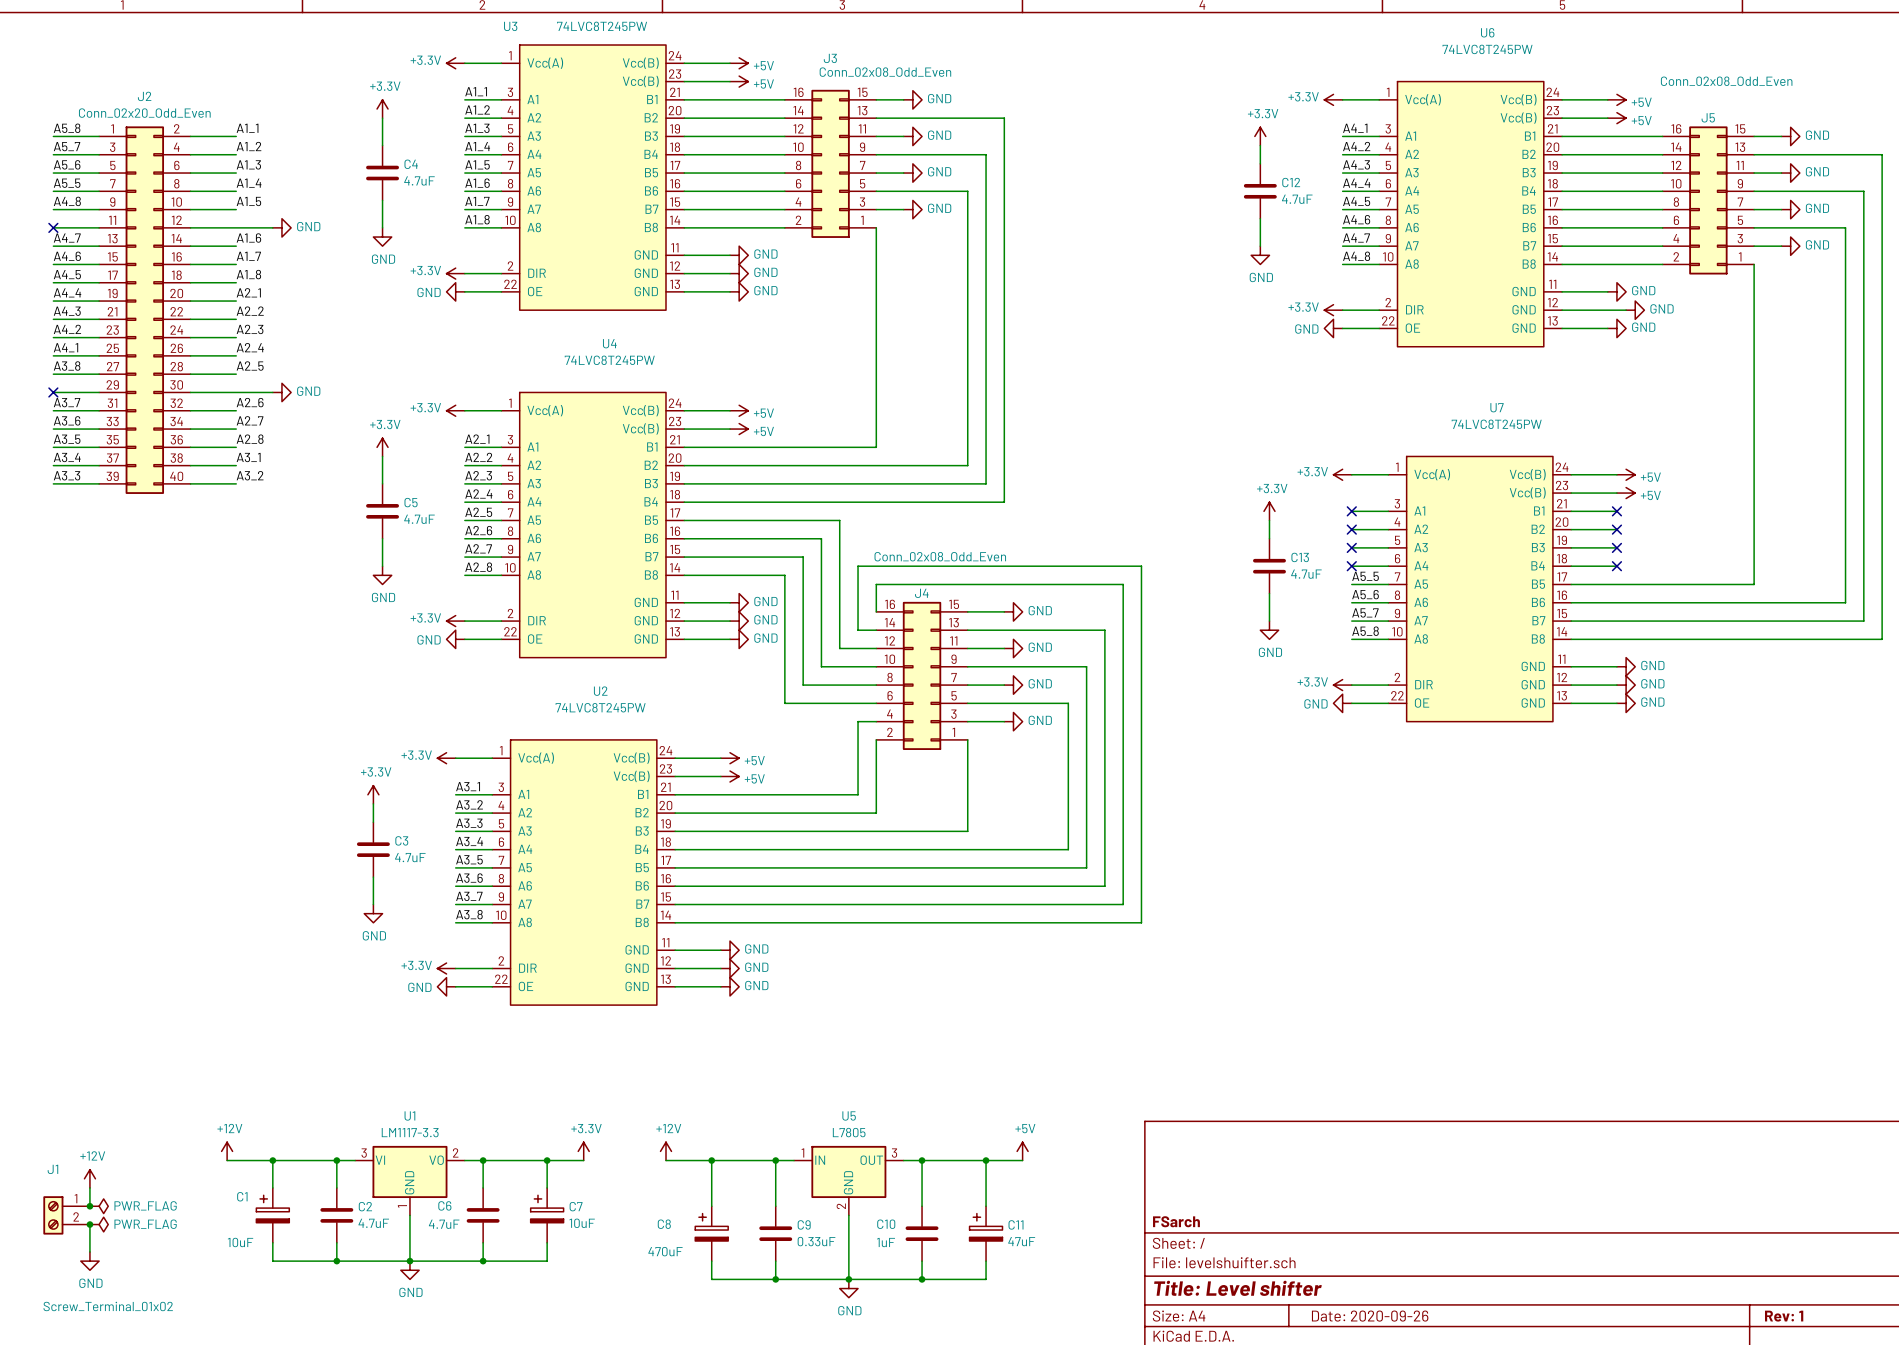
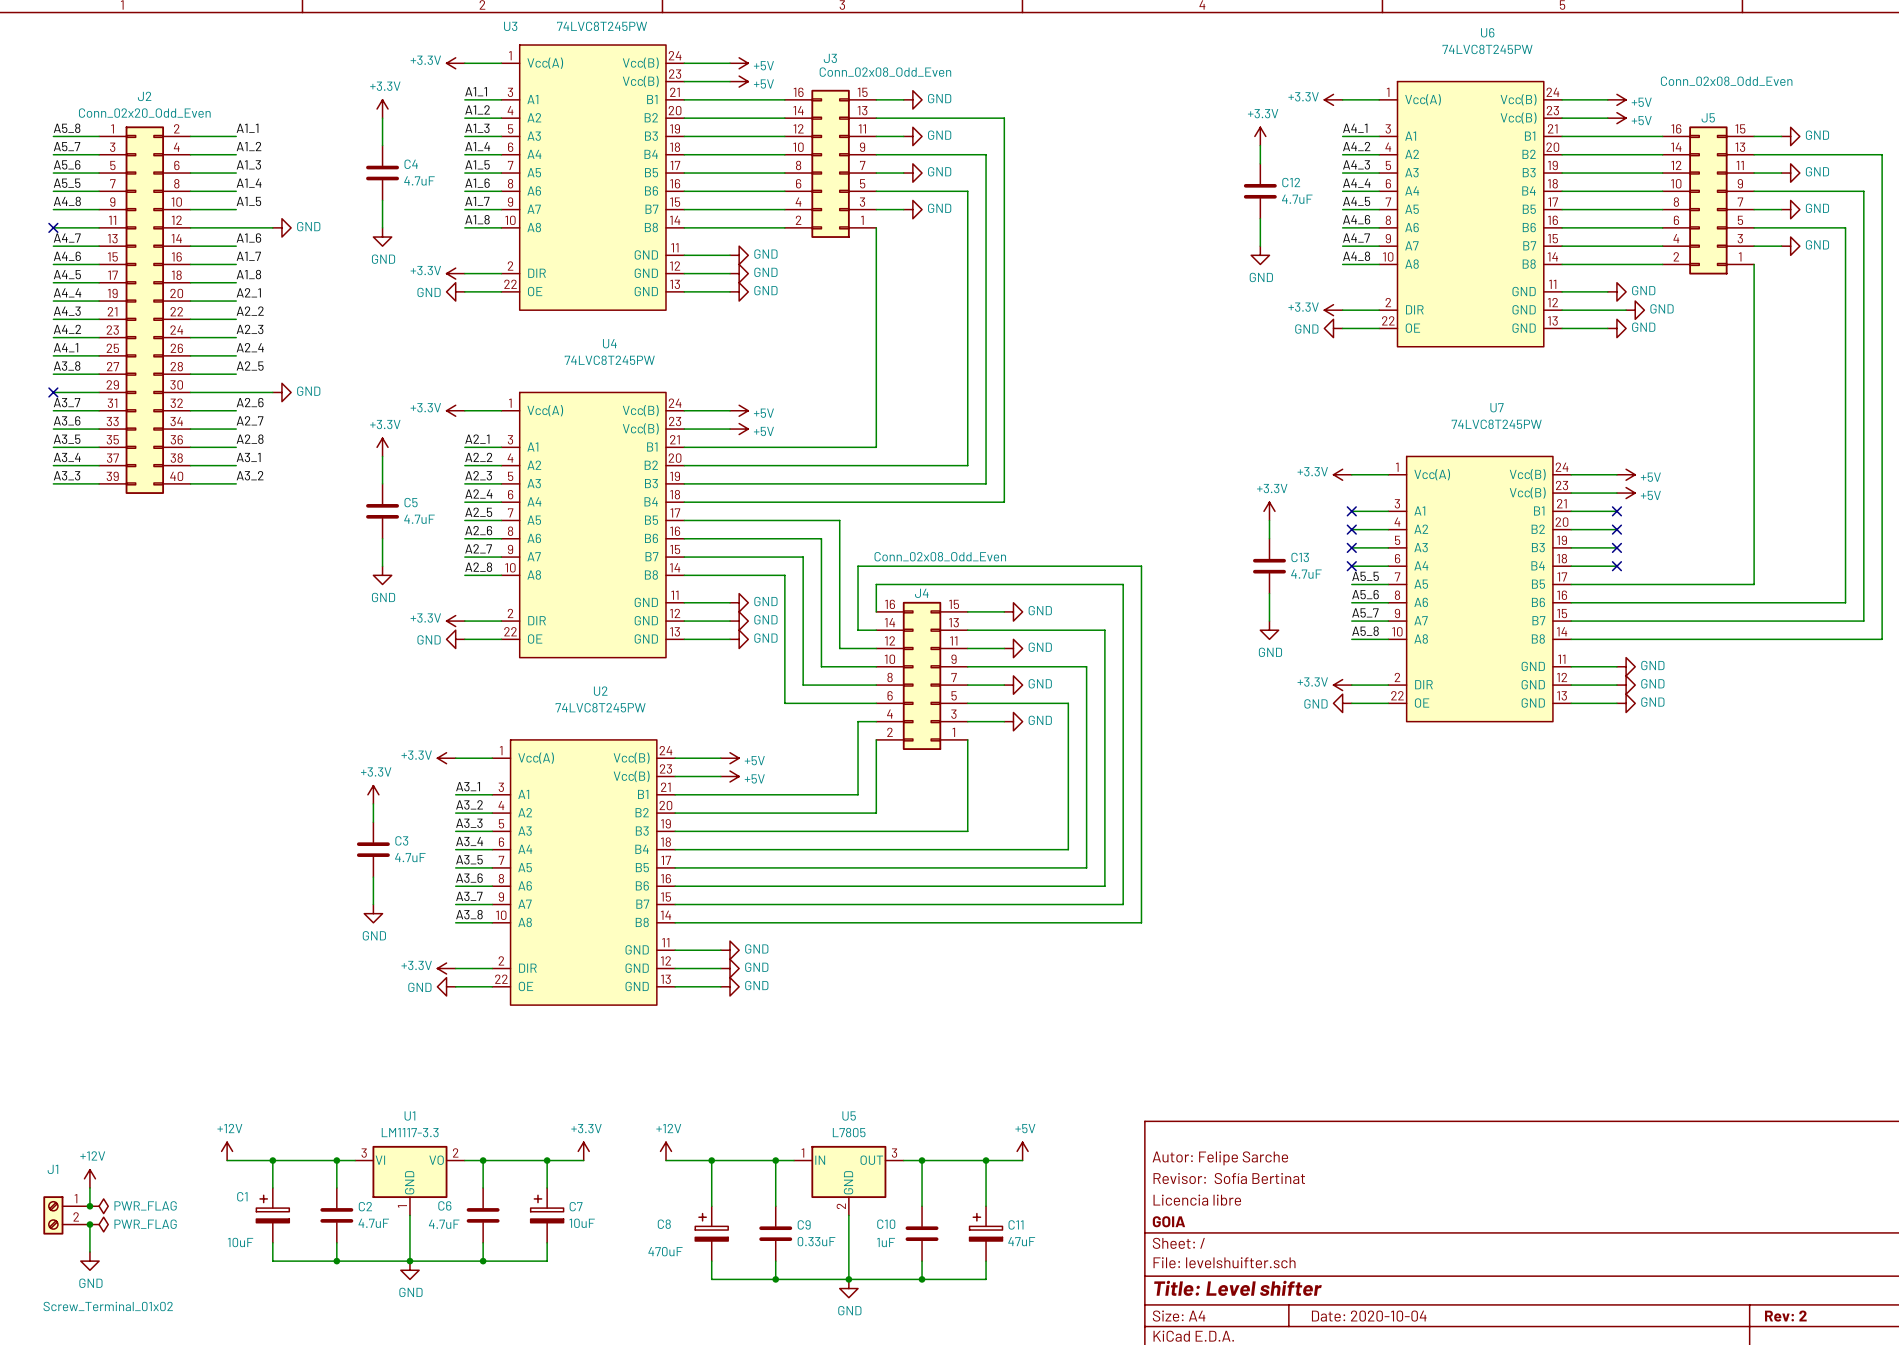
title block: none -> Autor: Felipe Sarche (1220, 1158)
title block: none -> Revisor: Sofía Bertinat (1229, 1178)
title block: none -> Licencia libre (1197, 1200)
title block: FSarch (1176, 1221) -> GOIA (1168, 1221)
title block: Date: 2020-09-26 (1370, 1316) -> Date: 2020-10-04 (1369, 1316)
title block: Rev: 1 (1784, 1316) -> Rev: 2 (1785, 1316)

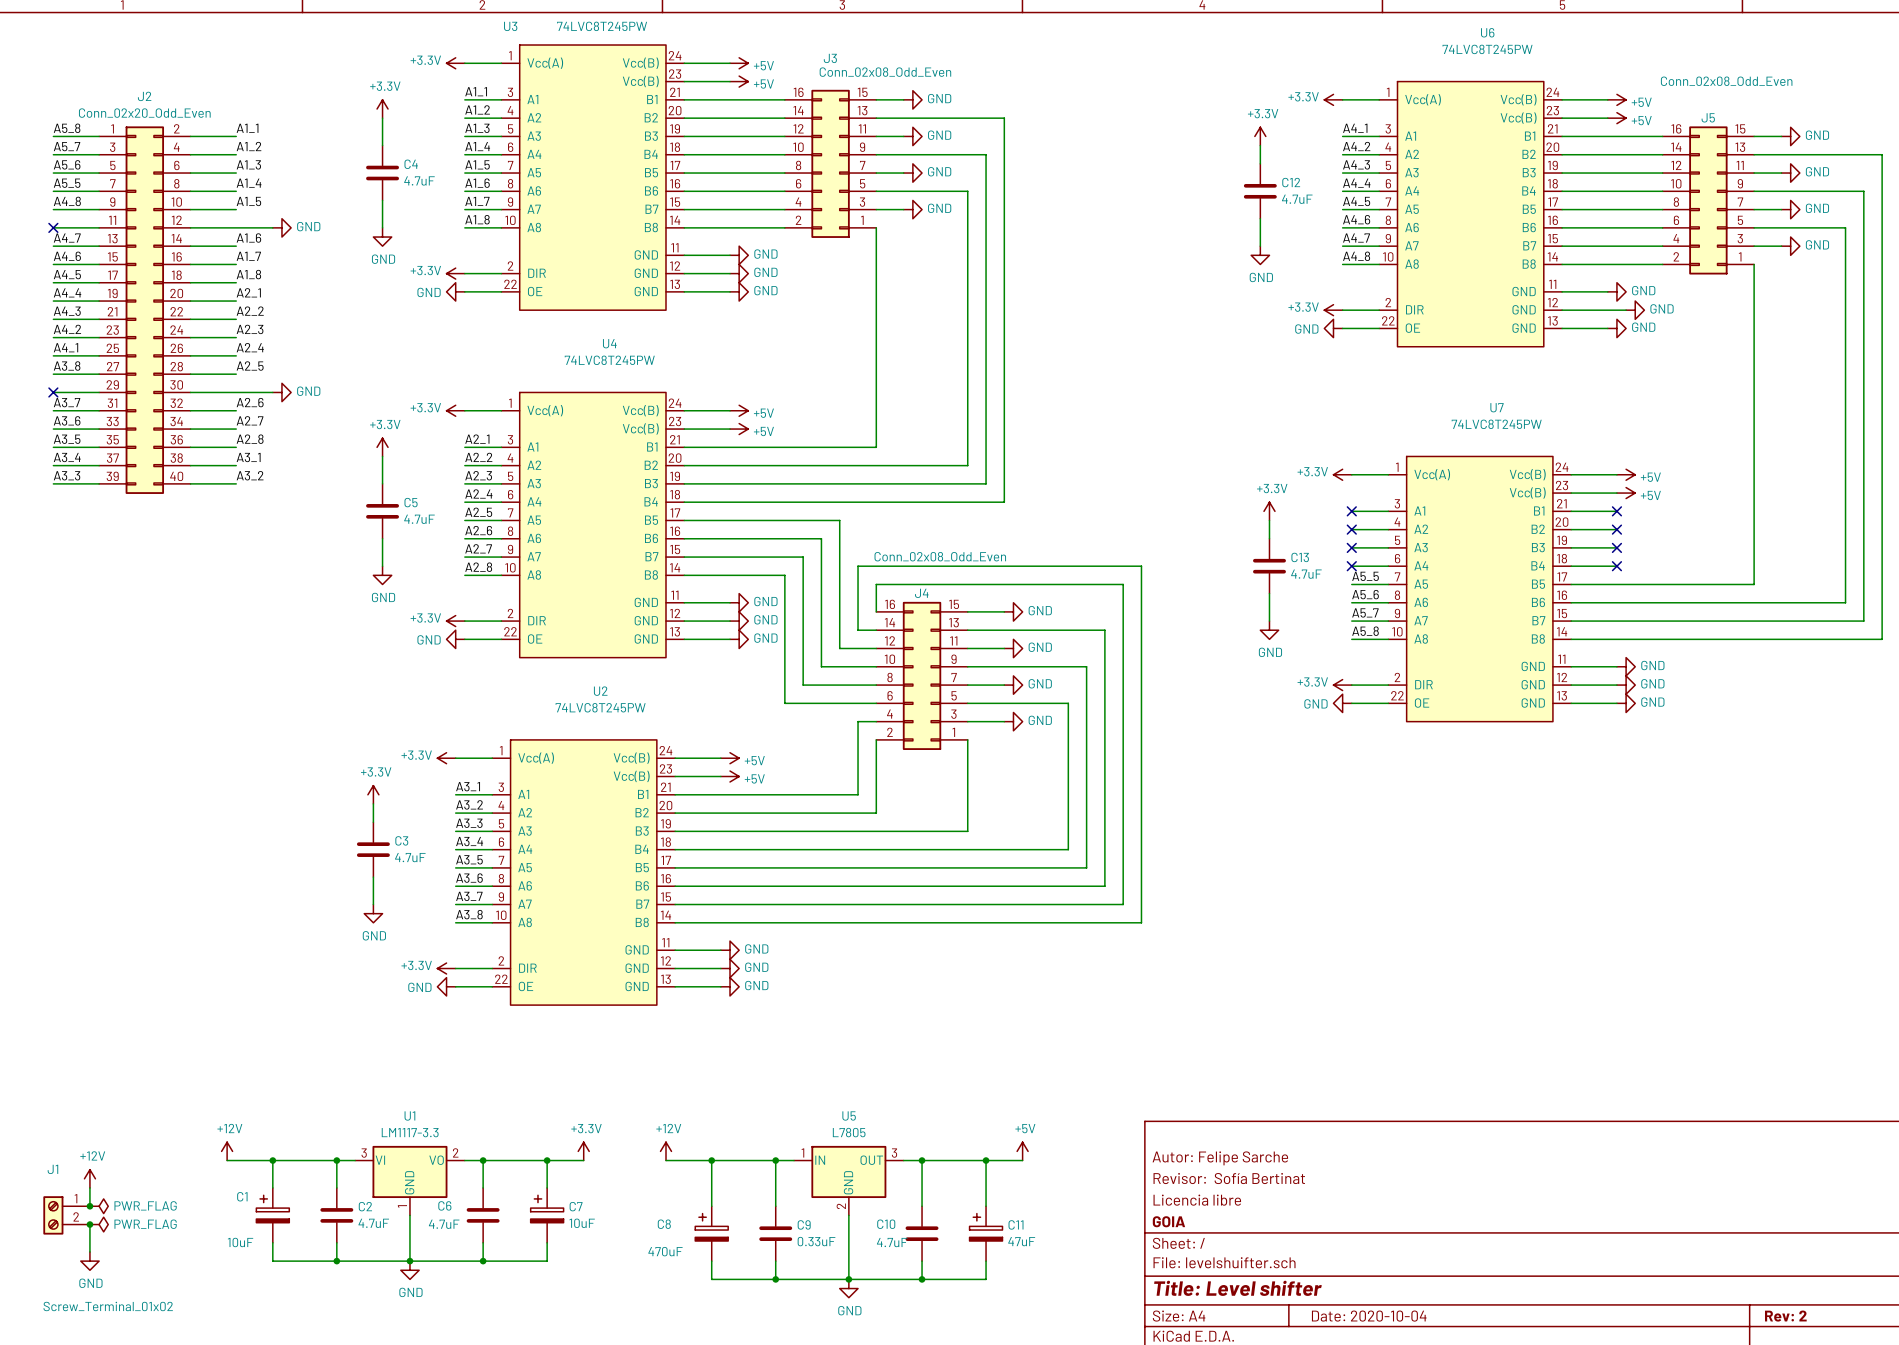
C10 value: 1uF (886, 1242) -> 4.7uF (892, 1242)

